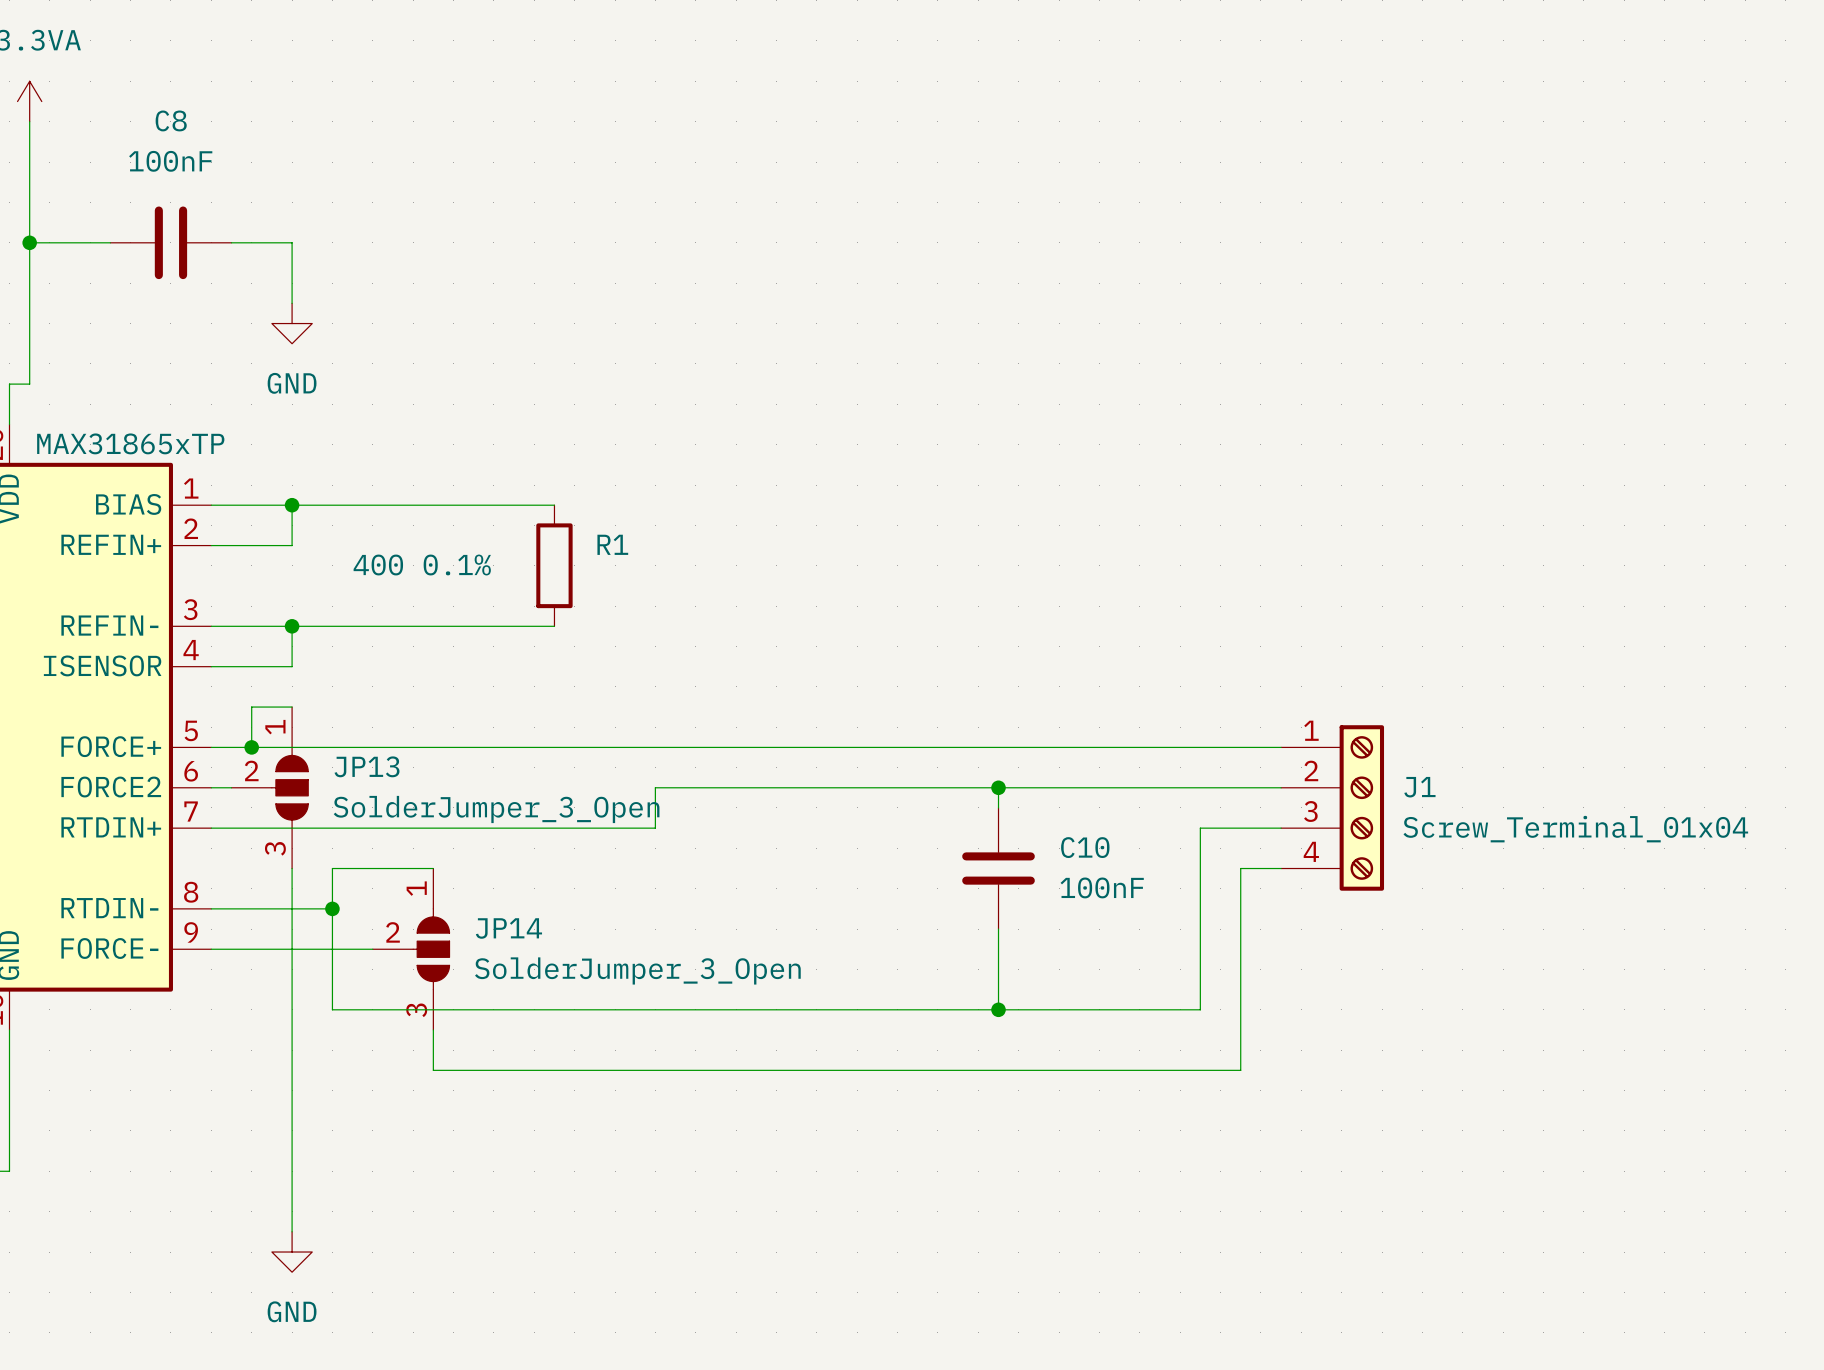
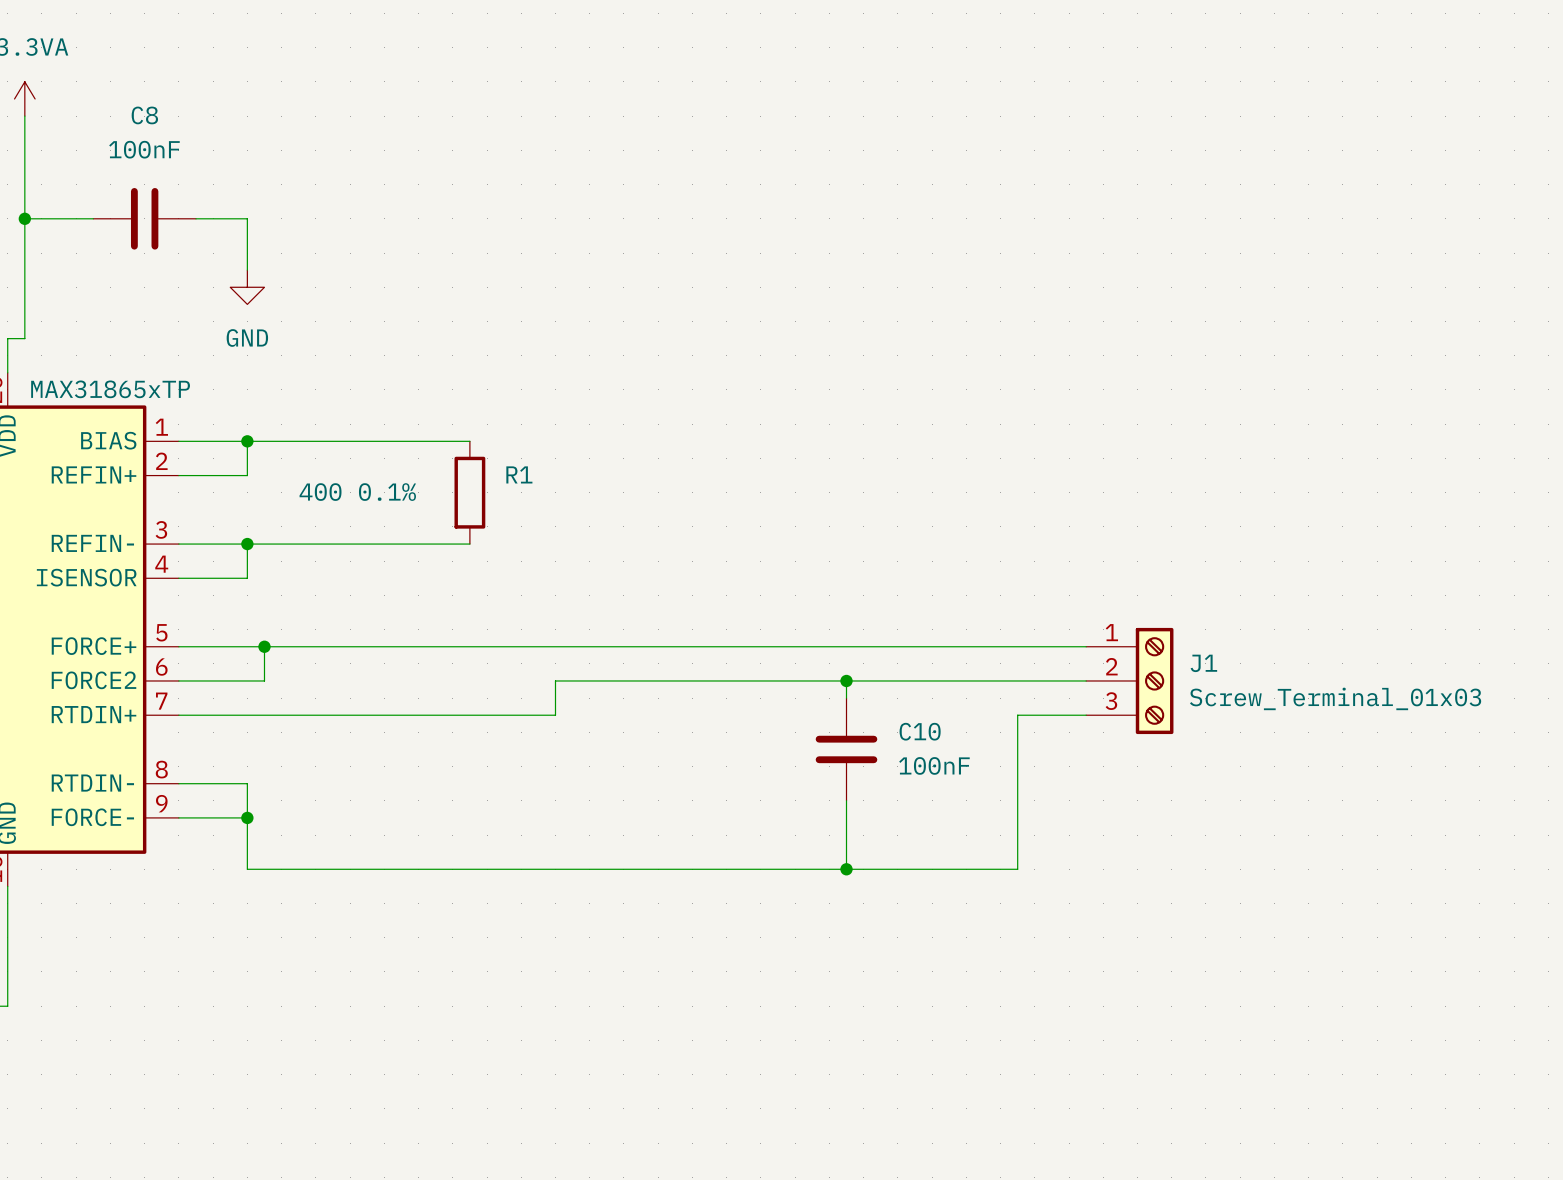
wire: (292, 707) (251, 707) (251, 747) -> none
J1 symbol: [1281, 725, 1385, 891] -> [1086, 627, 1174, 735]
junction position: (251, 747) -> (264, 646)
wire: none -> (264, 646) (264, 680) (196, 680)
JP13: SolderJumper_3_Open (269, 787) -> none
J1 value: Screw_Terminal_01x04 (1575, 829) -> Screw_Terminal_01x03 (1335, 698)
wire: (292, 868) (292, 908) (332, 908) -> none
wire: (433, 868) (332, 868) (332, 1009) -> (247, 869) (281, 869)
wire: (1281, 868) (1240, 868) (1240, 1070) (433, 1070) (433, 1029) -> none
junction position: (332, 908) -> (247, 817)
wire: (292, 949) (372, 949) -> none
JP14: SolderJumper_3_Open (411, 949) -> none
wire: (292, 1009) (292, 1231) -> none
power symbol: GND (292, 1252) -> none

